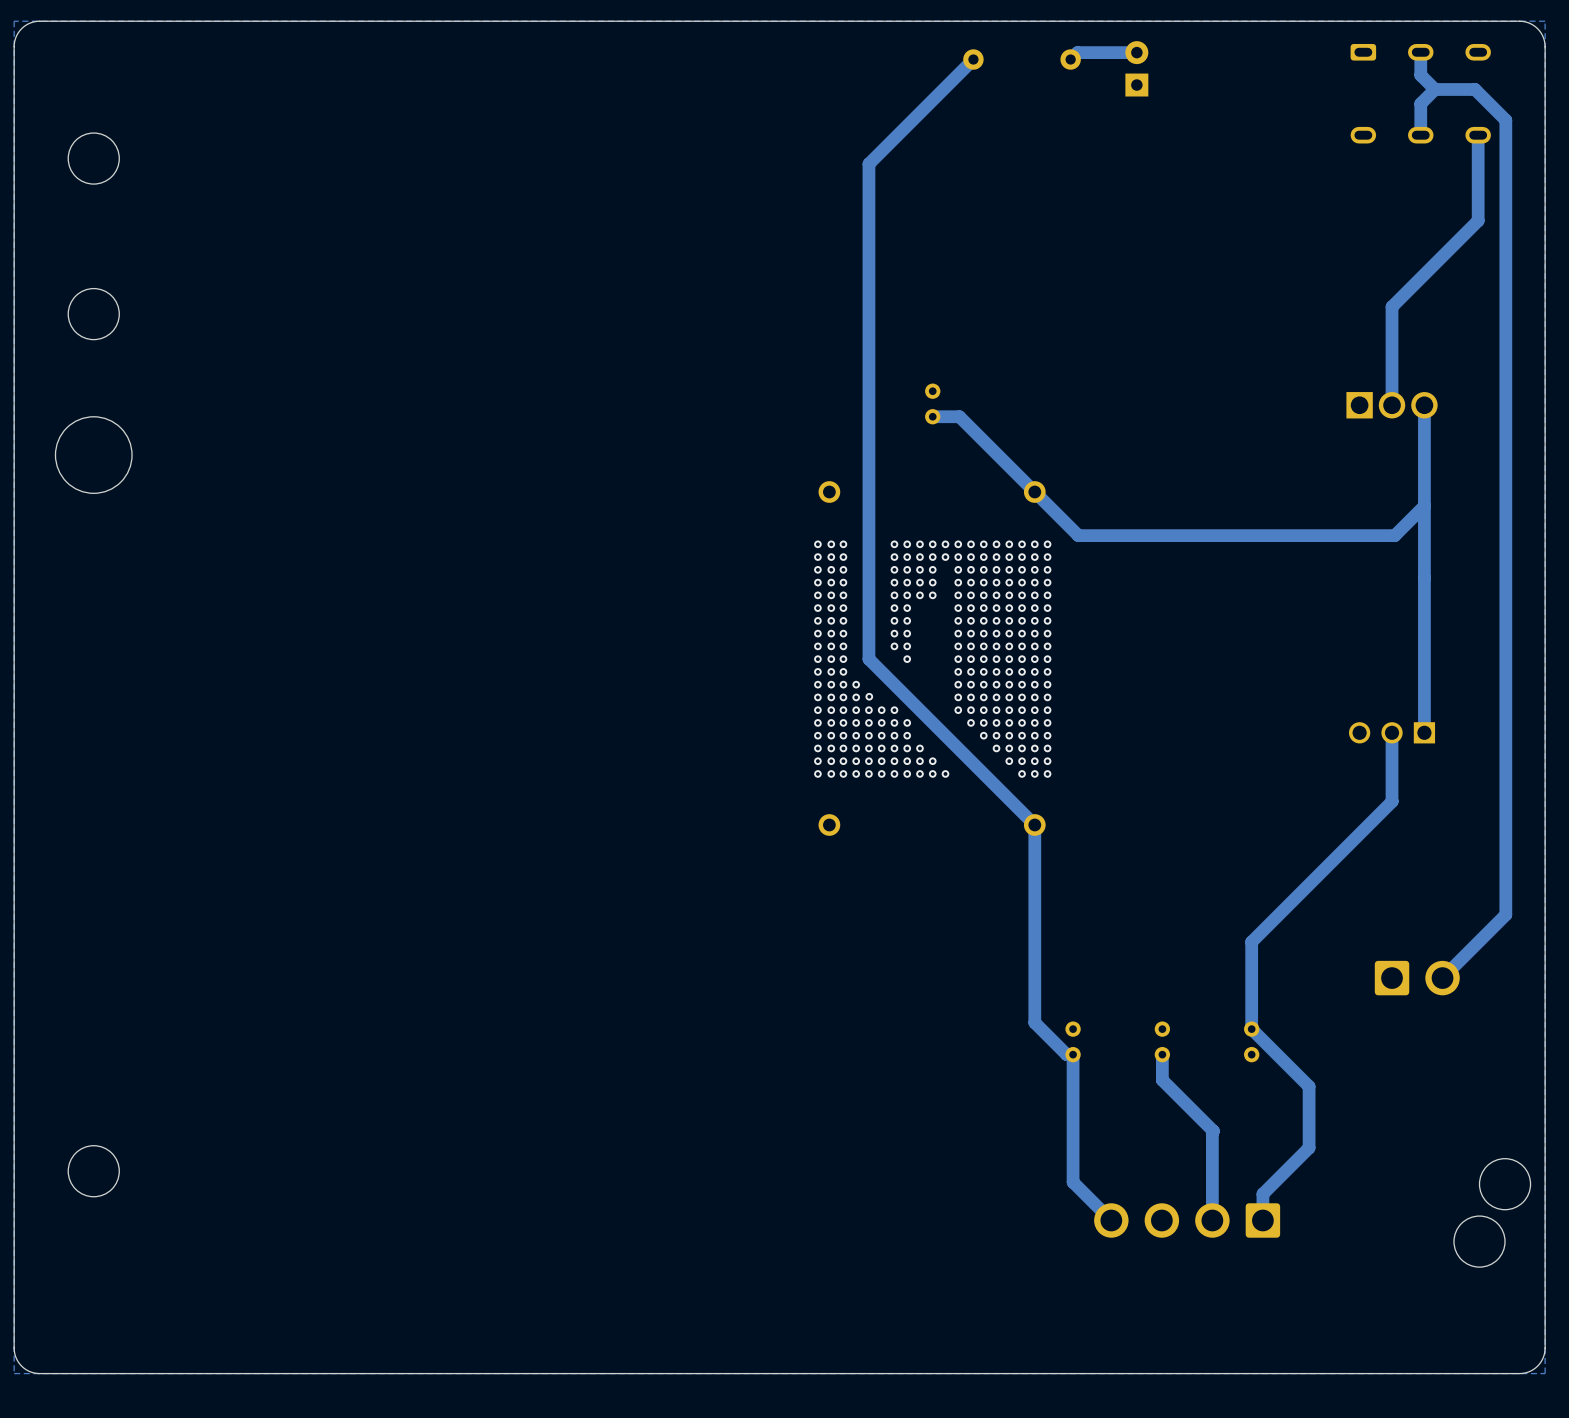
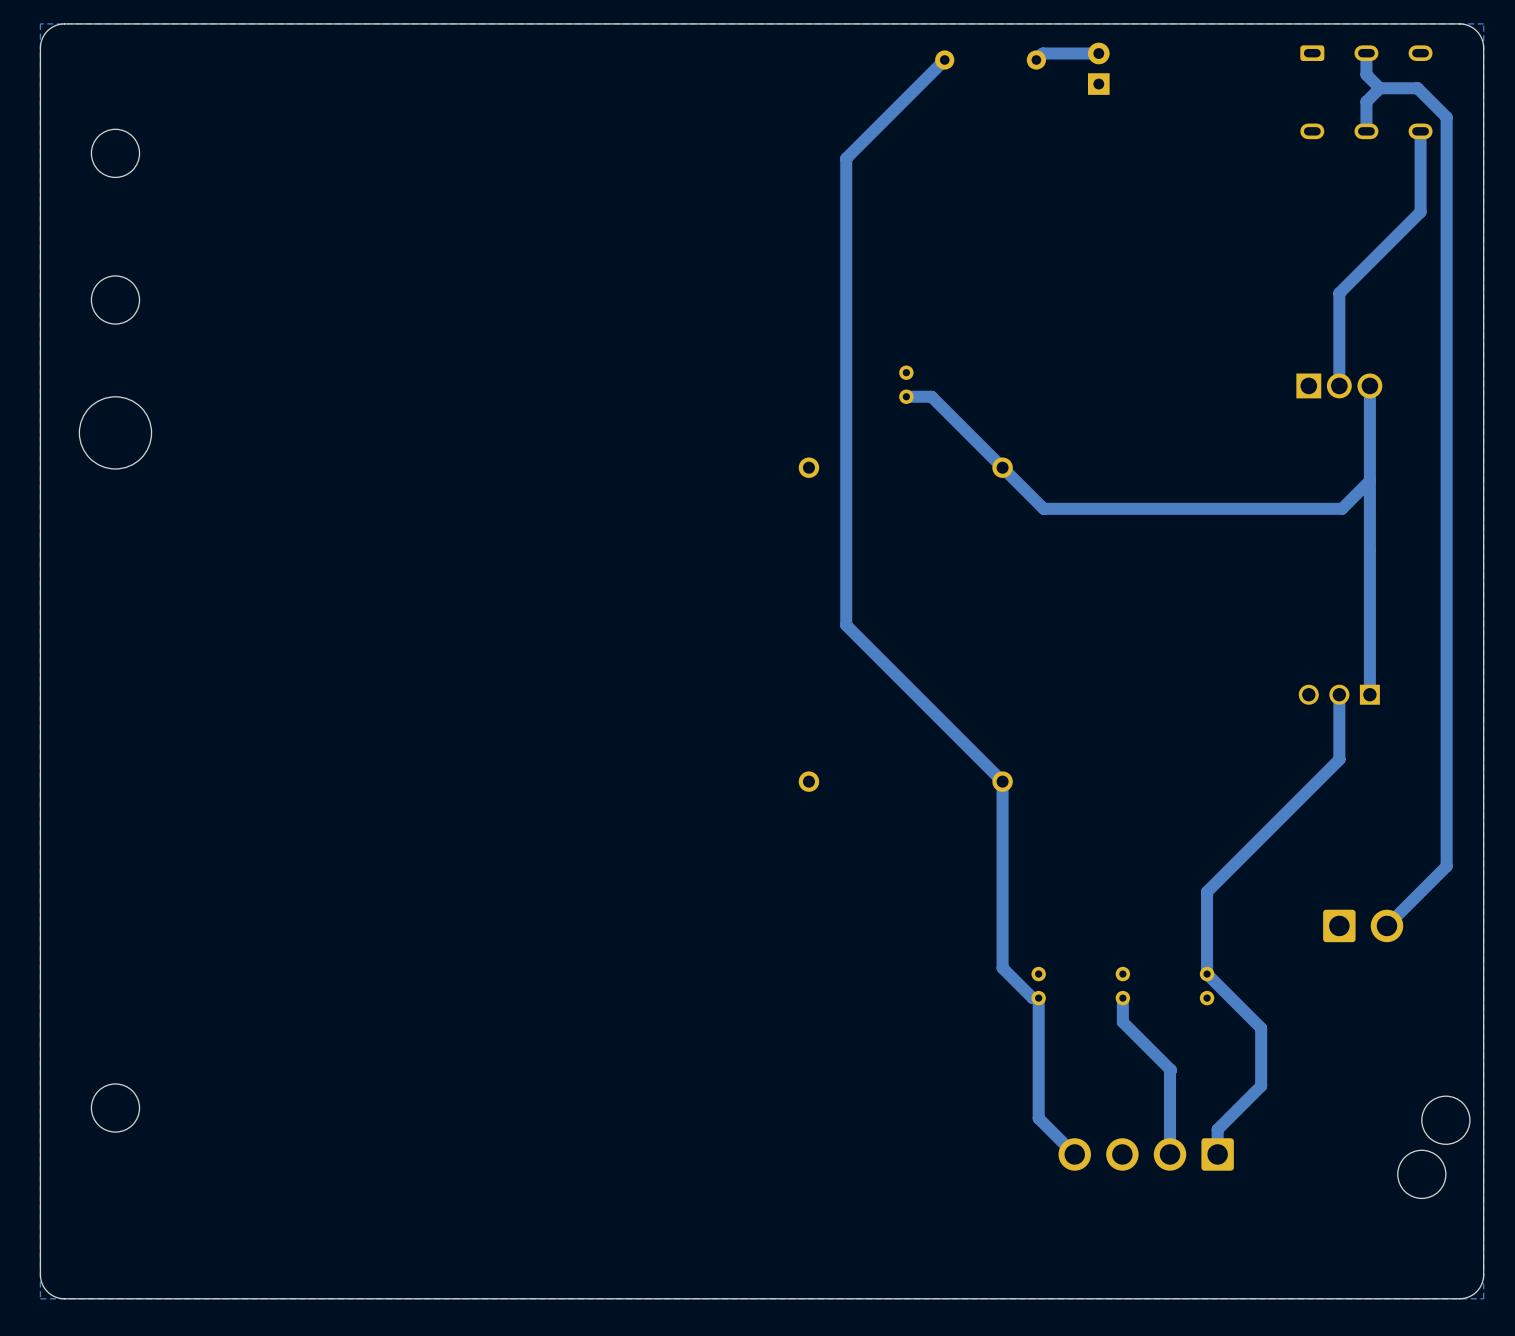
via: (817, 544) -> none
via: (831, 544) -> none
via: (843, 544) -> none
via: (894, 544) -> none
via: (907, 544) -> none
via: (919, 544) -> none
via: (932, 544) -> none
via: (945, 544) -> none
via: (958, 544) -> none
via: (971, 544) -> none
via: (983, 544) -> none
via: (996, 544) -> none
via: (1009, 544) -> none
via: (1022, 544) -> none
via: (1034, 544) -> none
via: (1047, 544) -> none
via: (817, 557) -> none
via: (831, 557) -> none
via: (843, 557) -> none
via: (894, 557) -> none
via: (907, 557) -> none
via: (919, 557) -> none
via: (932, 557) -> none
via: (945, 557) -> none
via: (958, 557) -> none
via: (971, 557) -> none
via: (983, 557) -> none
via: (996, 557) -> none
via: (1009, 557) -> none
via: (1022, 557) -> none
via: (1034, 557) -> none
via: (1047, 557) -> none
via: (817, 569) -> none
via: (831, 569) -> none
via: (843, 569) -> none
via: (894, 569) -> none
via: (907, 569) -> none
via: (919, 569) -> none
via: (932, 569) -> none
via: (958, 569) -> none
via: (971, 569) -> none
via: (983, 569) -> none
via: (996, 569) -> none
via: (1009, 569) -> none
via: (1022, 569) -> none
via: (1034, 569) -> none
via: (1047, 569) -> none
via: (817, 582) -> none
via: (831, 582) -> none
via: (843, 582) -> none
via: (894, 582) -> none
via: (907, 582) -> none
via: (919, 582) -> none
via: (932, 582) -> none
via: (958, 582) -> none
via: (971, 582) -> none
via: (983, 582) -> none
via: (996, 582) -> none
via: (1009, 582) -> none
via: (1022, 582) -> none
via: (1034, 582) -> none
via: (1047, 582) -> none
via: (817, 595) -> none
via: (831, 595) -> none
via: (843, 595) -> none
via: (894, 595) -> none
via: (907, 595) -> none
via: (919, 595) -> none
via: (932, 595) -> none
via: (958, 595) -> none
via: (971, 595) -> none
via: (983, 595) -> none
via: (996, 595) -> none
via: (1009, 595) -> none
via: (1022, 595) -> none
via: (1034, 595) -> none
via: (1047, 595) -> none
via: (817, 608) -> none
via: (831, 608) -> none
via: (843, 608) -> none
via: (894, 608) -> none
via: (907, 608) -> none
via: (958, 608) -> none
via: (971, 608) -> none
via: (983, 608) -> none
via: (996, 608) -> none
via: (1009, 608) -> none
via: (1022, 608) -> none
via: (1034, 608) -> none
via: (1047, 608) -> none
via: (817, 620) -> none
via: (831, 620) -> none
via: (843, 620) -> none
via: (894, 620) -> none
via: (907, 620) -> none
via: (958, 620) -> none
via: (971, 620) -> none
via: (983, 620) -> none
via: (996, 620) -> none
via: (1009, 620) -> none
via: (1022, 620) -> none
via: (1034, 620) -> none
via: (1047, 620) -> none
via: (817, 633) -> none
via: (831, 633) -> none
via: (843, 633) -> none
via: (894, 633) -> none
via: (907, 633) -> none
via: (958, 633) -> none
via: (971, 633) -> none
via: (983, 633) -> none
via: (996, 633) -> none
via: (1009, 633) -> none
via: (1022, 633) -> none
via: (1034, 633) -> none
via: (1047, 633) -> none
via: (817, 646) -> none
via: (831, 646) -> none
via: (843, 646) -> none
via: (894, 646) -> none
via: (907, 646) -> none
via: (958, 646) -> none
via: (971, 646) -> none
via: (983, 646) -> none
via: (996, 646) -> none
via: (1009, 646) -> none
via: (1022, 646) -> none
via: (1034, 646) -> none
via: (1047, 646) -> none
via: (817, 659) -> none
via: (831, 659) -> none
via: (843, 659) -> none
via: (907, 659) -> none
via: (958, 659) -> none
via: (971, 659) -> none
via: (983, 659) -> none
via: (996, 659) -> none
via: (1009, 659) -> none
via: (1022, 659) -> none
via: (1034, 659) -> none
via: (1047, 659) -> none
via: (817, 671) -> none
via: (831, 671) -> none
via: (843, 671) -> none
via: (958, 671) -> none
via: (971, 671) -> none
via: (983, 671) -> none
via: (996, 671) -> none
via: (1009, 671) -> none
via: (1022, 671) -> none
via: (1034, 671) -> none
via: (1047, 671) -> none
via: (817, 684) -> none
via: (831, 684) -> none
via: (843, 684) -> none
via: (856, 684) -> none
via: (958, 684) -> none
via: (971, 684) -> none
via: (983, 684) -> none
via: (996, 684) -> none
via: (1009, 684) -> none
via: (1022, 684) -> none
via: (1034, 684) -> none
via: (1047, 684) -> none
via: (869, 696) -> none
via: (817, 697) -> none
via: (831, 697) -> none
via: (843, 697) -> none
via: (856, 697) -> none
via: (958, 697) -> none
via: (971, 697) -> none
via: (983, 697) -> none
via: (996, 697) -> none
via: (1009, 697) -> none
via: (1022, 697) -> none
via: (1034, 697) -> none
via: (1047, 697) -> none
via: (817, 710) -> none
via: (831, 710) -> none
via: (843, 710) -> none
via: (856, 710) -> none
via: (868, 710) -> none
via: (881, 710) -> none
via: (894, 710) -> none
via: (958, 710) -> none
via: (971, 710) -> none
via: (983, 710) -> none
via: (996, 710) -> none
via: (1009, 710) -> none
via: (1022, 710) -> none
via: (1034, 710) -> none
via: (1047, 710) -> none
via: (817, 722) -> none
via: (831, 722) -> none
via: (843, 722) -> none
via: (856, 722) -> none
via: (868, 722) -> none
via: (881, 722) -> none
via: (894, 722) -> none
via: (907, 722) -> none
via: (971, 722) -> none
via: (983, 722) -> none
via: (996, 722) -> none
via: (1009, 722) -> none
via: (1022, 722) -> none
via: (1034, 722) -> none
via: (1047, 722) -> none
via: (817, 735) -> none
via: (831, 735) -> none
via: (843, 735) -> none
via: (856, 735) -> none
via: (868, 735) -> none
via: (881, 735) -> none
via: (894, 735) -> none
via: (907, 735) -> none
via: (983, 735) -> none
via: (996, 735) -> none
via: (1009, 735) -> none
via: (1022, 735) -> none
via: (1034, 735) -> none
via: (1047, 735) -> none
via: (817, 748) -> none
via: (831, 748) -> none
via: (843, 748) -> none
via: (856, 748) -> none
via: (868, 748) -> none
via: (881, 748) -> none
via: (894, 748) -> none
via: (907, 748) -> none
via: (919, 748) -> none
via: (996, 748) -> none
via: (1009, 748) -> none
via: (1022, 748) -> none
via: (1034, 748) -> none
via: (1047, 748) -> none
via: (817, 761) -> none
via: (831, 761) -> none
via: (843, 761) -> none
via: (856, 761) -> none
via: (868, 761) -> none
via: (881, 761) -> none
via: (894, 761) -> none
via: (907, 761) -> none
via: (919, 761) -> none
via: (932, 761) -> none
via: (1009, 761) -> none
via: (1022, 761) -> none
via: (1034, 761) -> none
via: (1047, 761) -> none
via: (817, 773) -> none
via: (831, 773) -> none
via: (843, 773) -> none
via: (856, 773) -> none
via: (868, 773) -> none
via: (881, 773) -> none
via: (894, 773) -> none
via: (907, 773) -> none
via: (919, 773) -> none
via: (932, 773) -> none
via: (945, 773) -> none
via: (1022, 773) -> none
via: (1034, 773) -> none
via: (1047, 773) -> none

